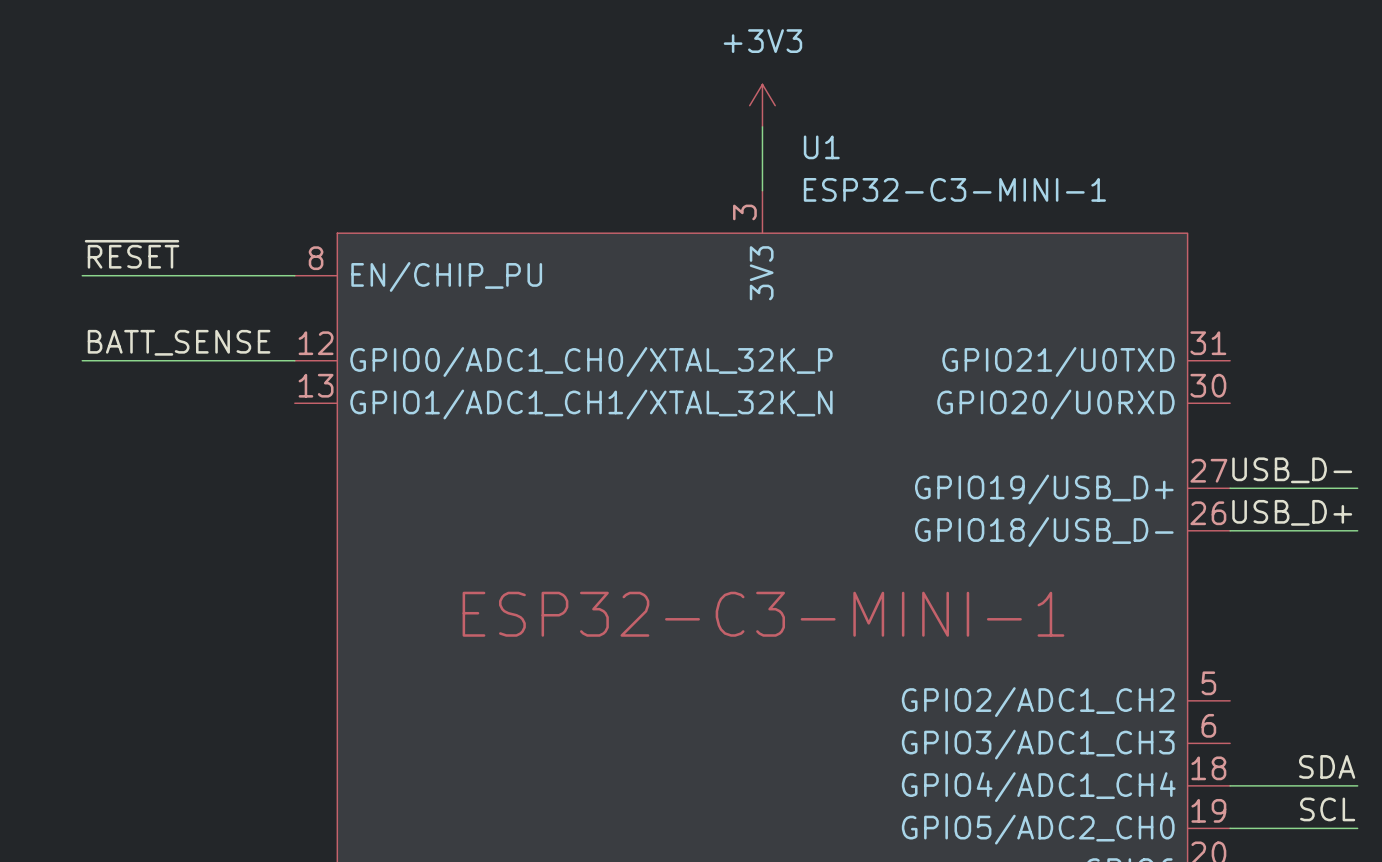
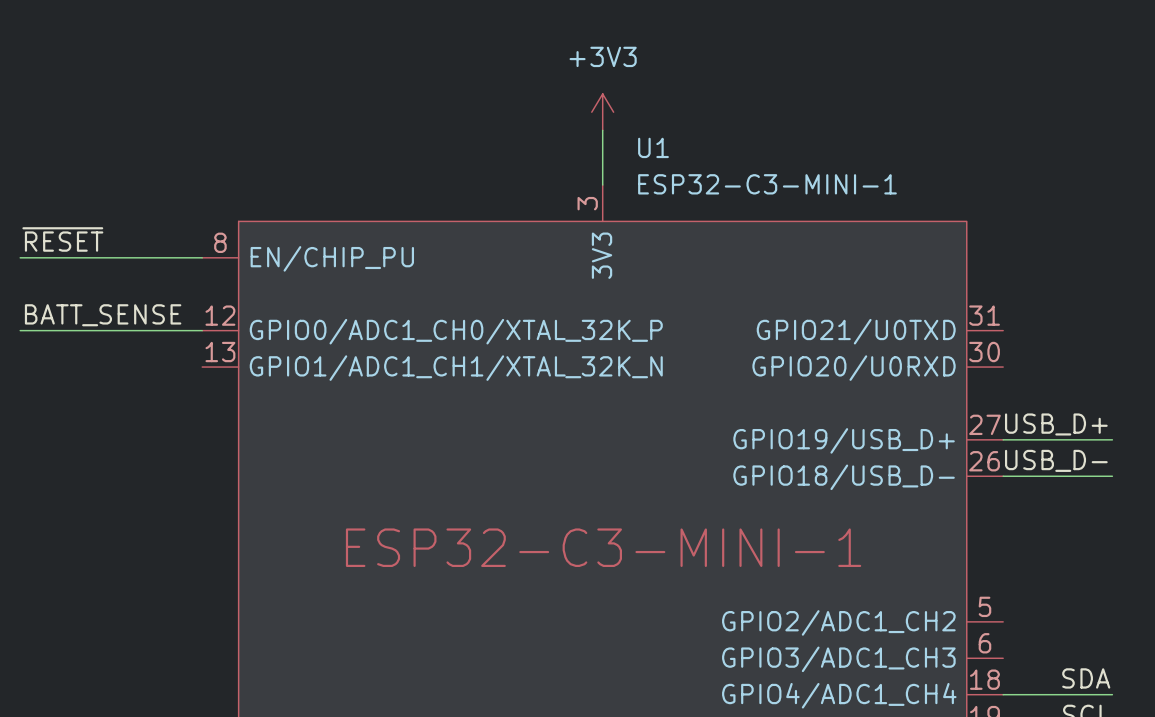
label: USB_D- (1292, 470) -> USB_D+ (1056, 424)
label: USB_D+ (1292, 512) -> USB_D- (1056, 460)

